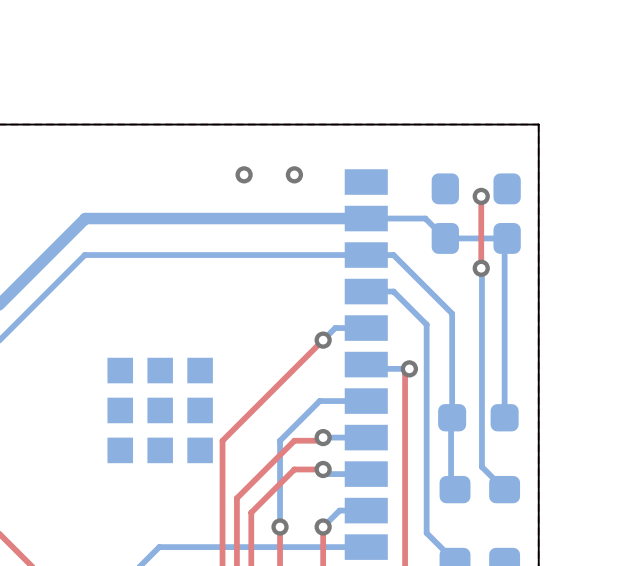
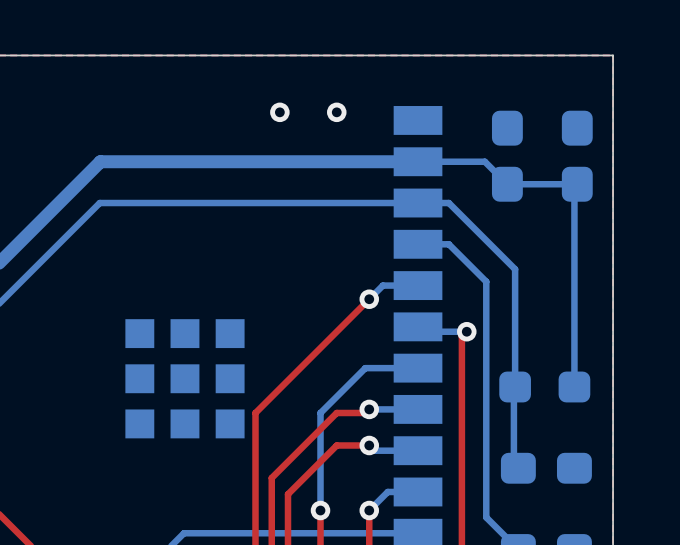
top track: (481, 196) (481, 268) -> none
via: (481, 196) -> none
bottom track: (481, 268) (481, 466) (504, 489) -> none
via: (481, 268) -> none

